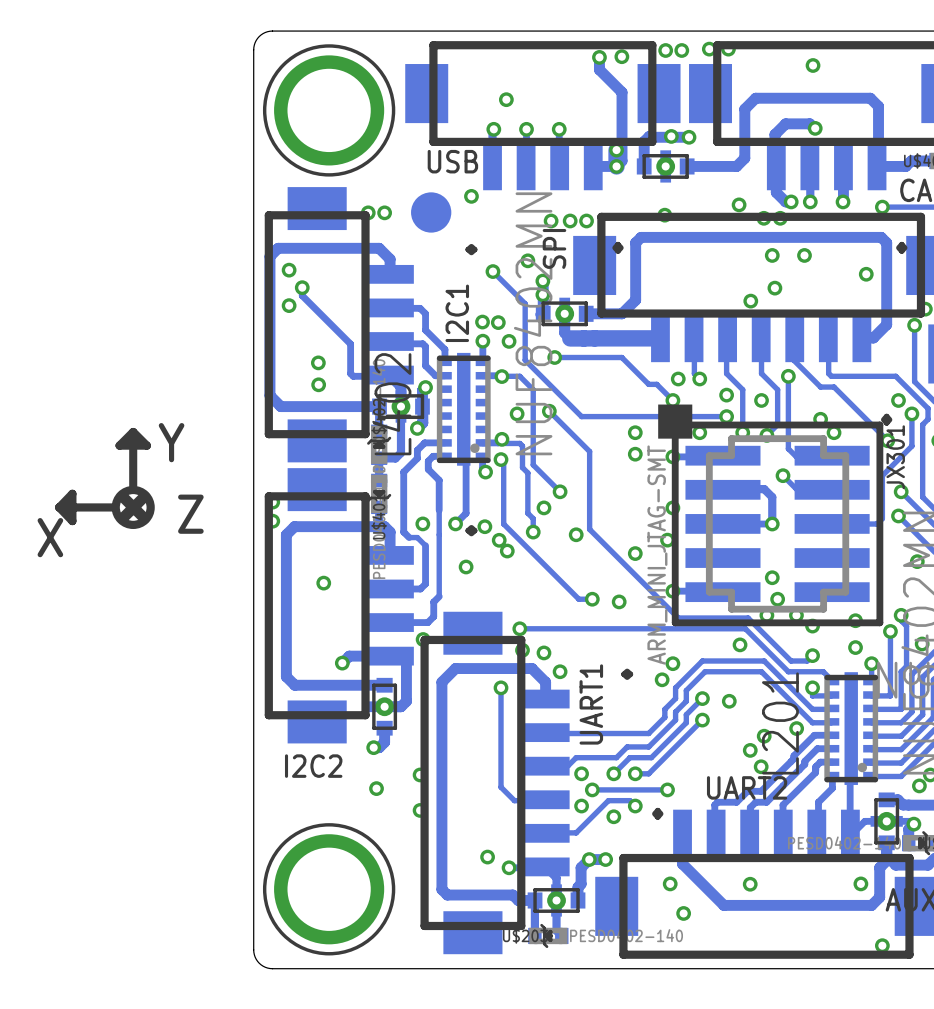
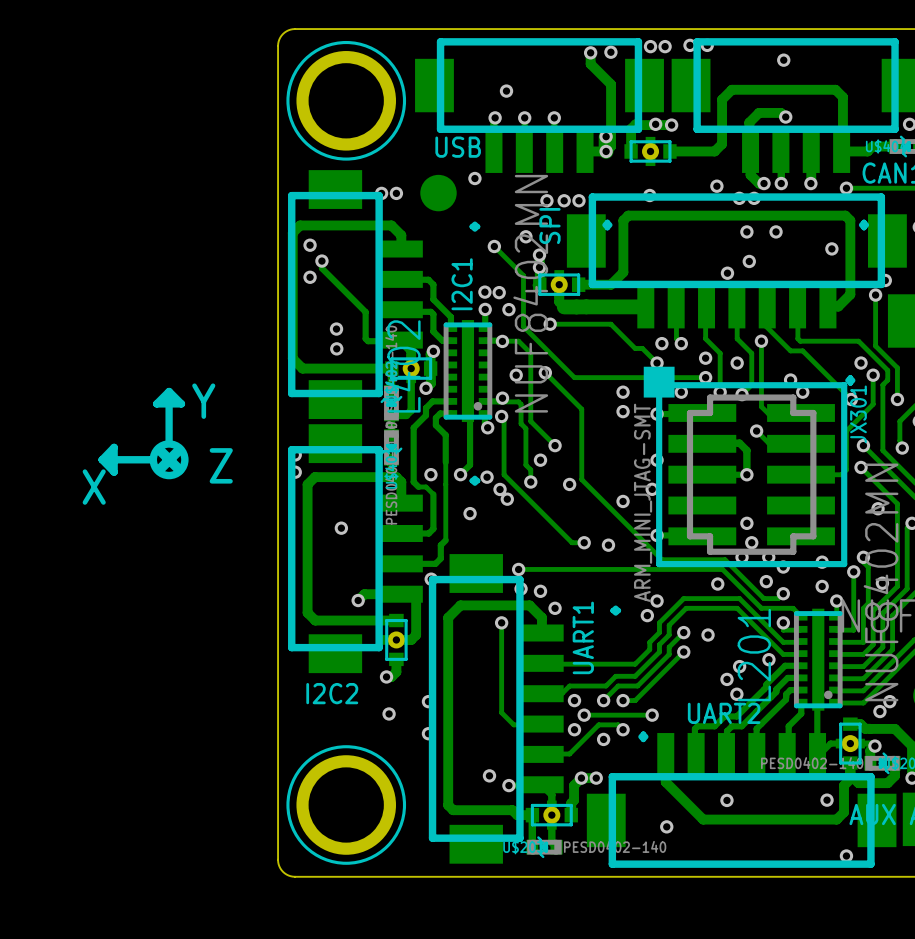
via: none -> (766, 581)
via: (670, 883) -> none

